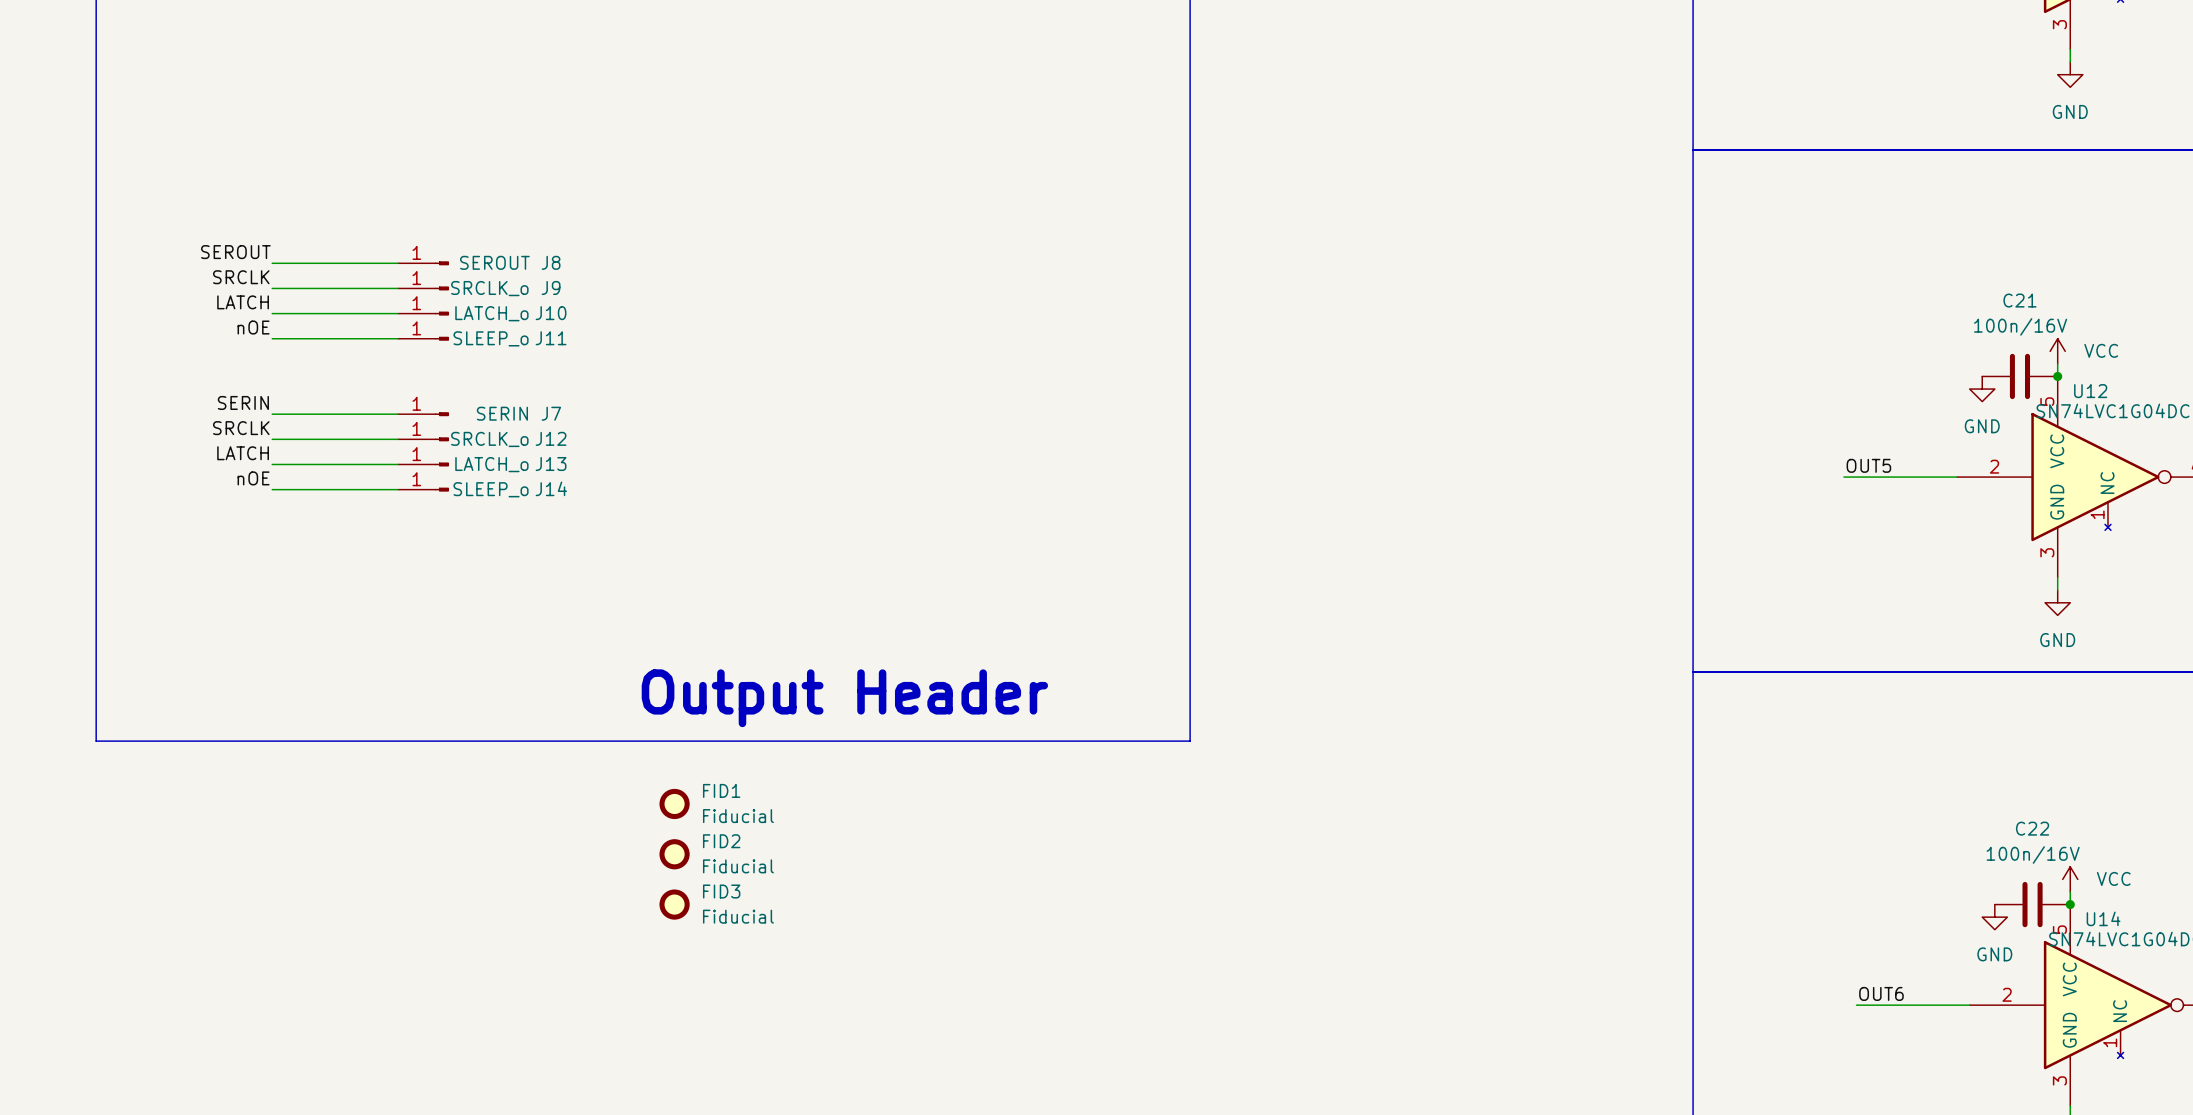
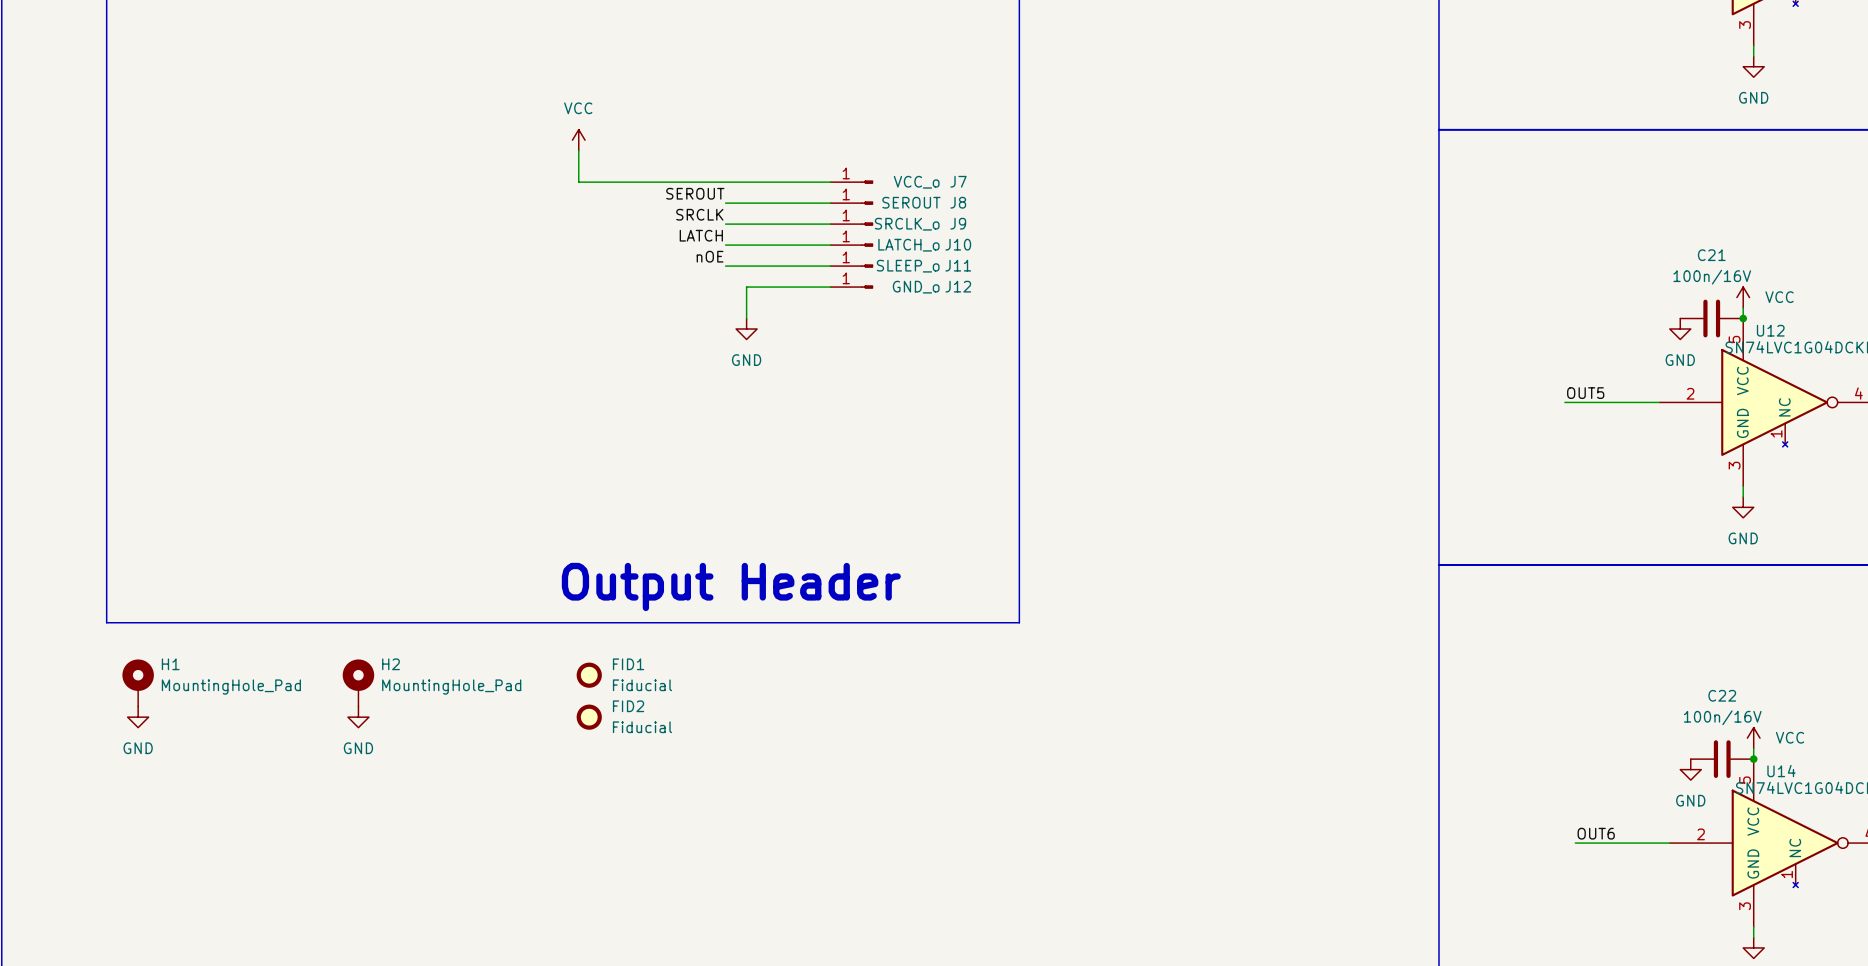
power symbol: none -> VCC (578, 140)
wire: none -> (578, 150) (578, 182) (830, 182)
label: none -> SEROUT (695, 193)
wire: none -> (725, 203) (830, 203)
label: SEROUT (235, 252) -> none
label: none -> SRCLK (699, 214)
wire: (272, 263) (397, 263) -> none
J8 position: (423, 263) -> (851, 203)
wire: none -> (725, 224) (830, 224)
label: SRCLK (241, 277) -> none
label: none -> LATCH (701, 235)
wire: (272, 288) (397, 288) -> none
J9 position: (423, 288) -> (851, 224)
wire: none -> (725, 245) (830, 245)
label: LATCH (243, 302) -> none
label: none -> nOE (710, 256)
wire: (272, 313) (397, 313) -> none
J10 position: (423, 313) -> (851, 245)
wire: none -> (725, 266) (830, 266)
label: nOE (253, 327) -> none
wire: (272, 338) (397, 338) -> none
J11 position: (423, 338) -> (851, 266)
wire: none -> (830, 287) (746, 287) (746, 318)
power symbol: none -> GND (746, 329)
label: SERIN (243, 402) -> none
J7 value: SERIN (502, 413) -> VCC_o (916, 182)
wire: (272, 414) (397, 414) -> none
J7 position: (423, 414) -> (851, 182)
label: SRCLK (241, 428) -> none
wire: (272, 439) (397, 439) -> none
J12 position: (423, 439) -> (851, 287)
J12 value: SRCLK_o (489, 439) -> GND_o (916, 287)
label: LATCH (243, 453) -> none
wire: (272, 464) (397, 464) -> none
J13: LATCH_o (423, 464) -> none
label: nOE (253, 478) -> none
wire: (272, 489) (397, 489) -> none
J14: SLEEP_o (423, 489) -> none
H1: none -> MountingHole_Pad (138, 683)
H2: none -> MountingHole_Pad (358, 683)
power symbol: none -> GND (138, 717)
power symbol: none -> GND (358, 717)
FID3: Fiducial (674, 904) -> none

